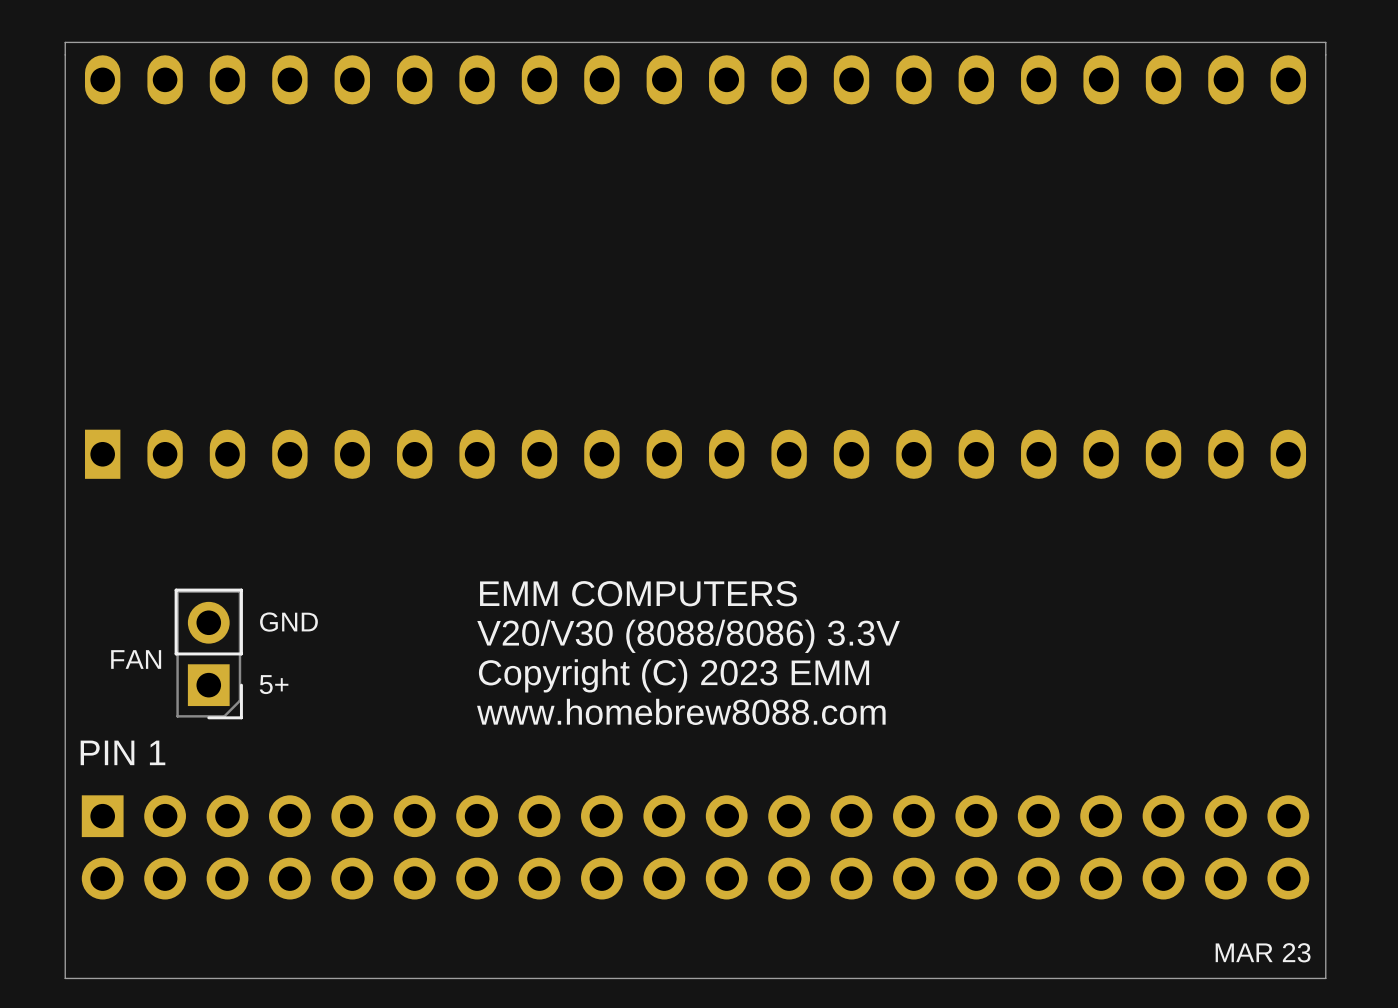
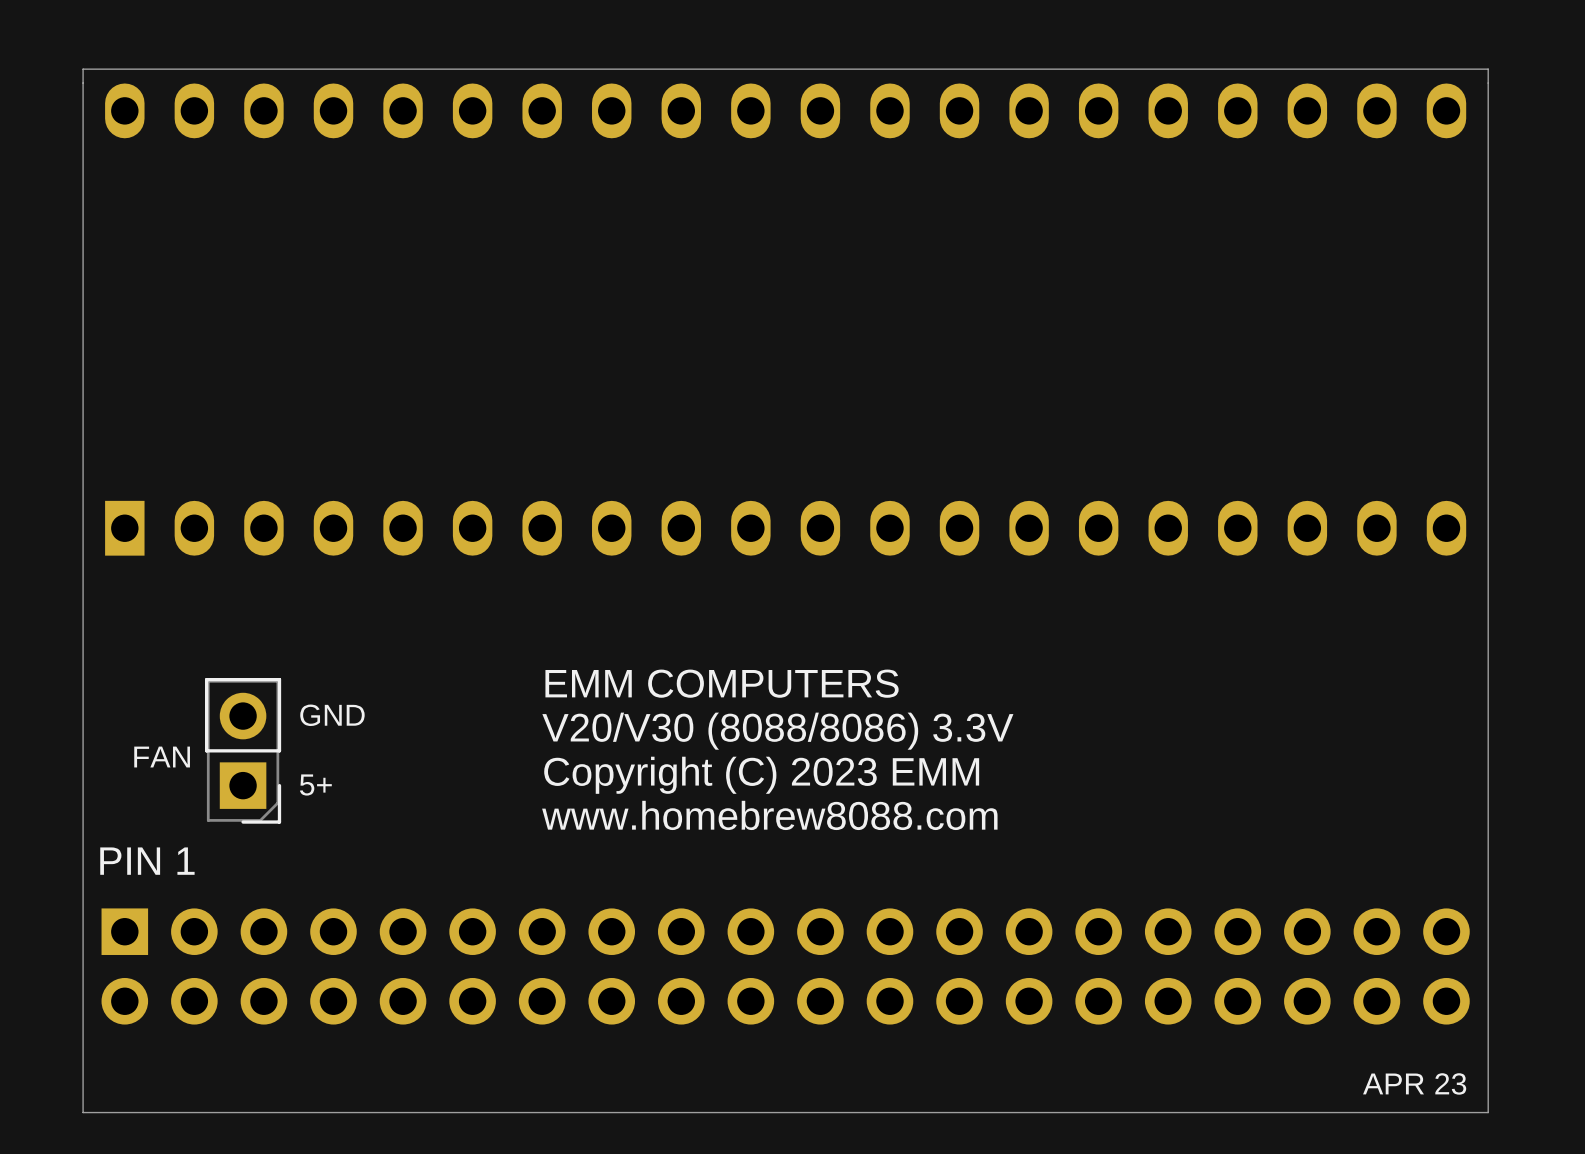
text: MAR 23 (1263, 952) -> APR 23 (1414, 1083)

